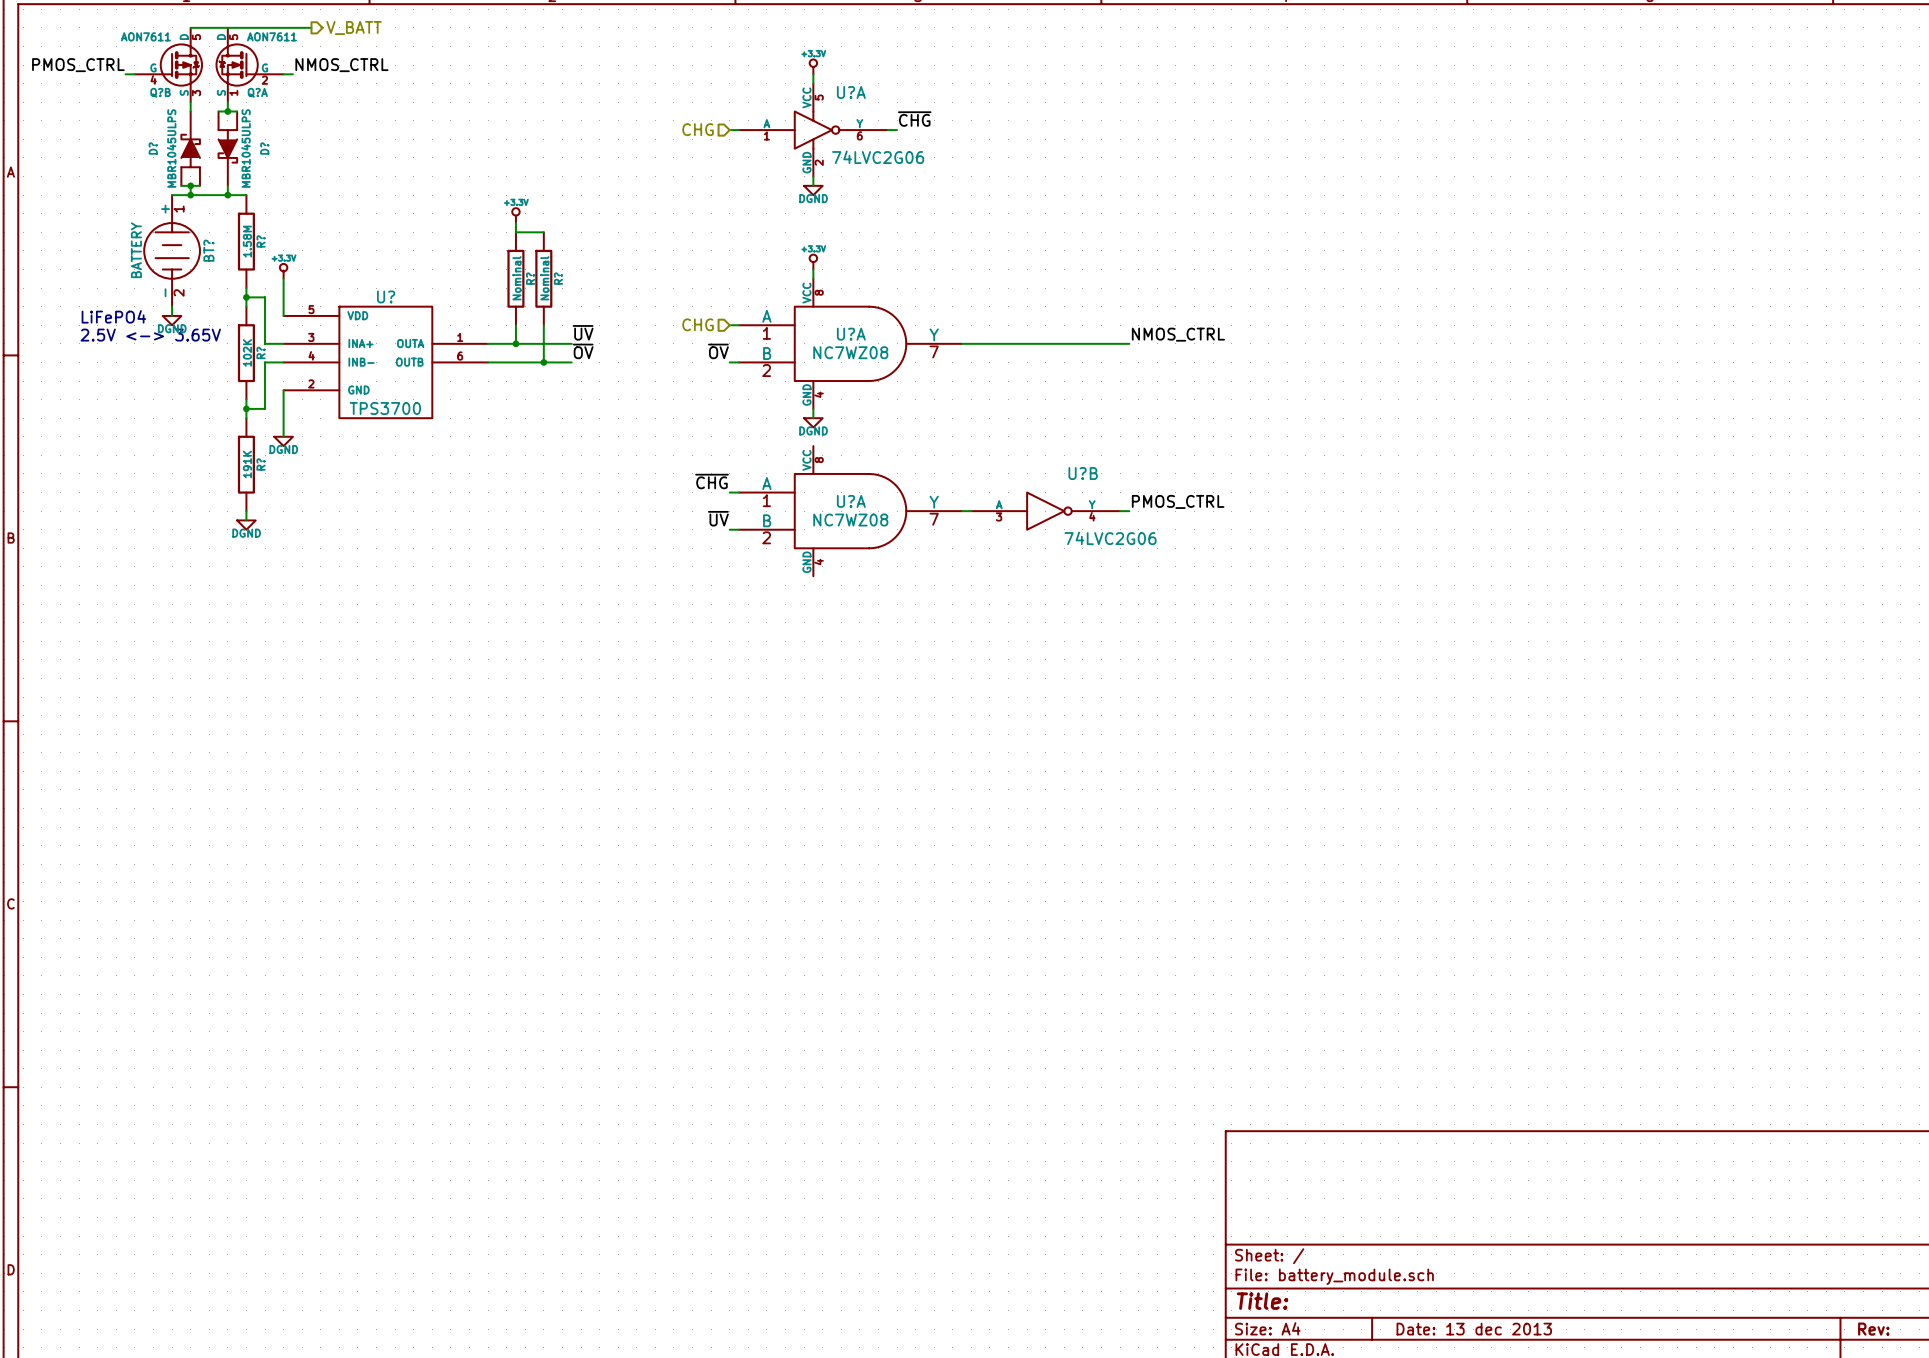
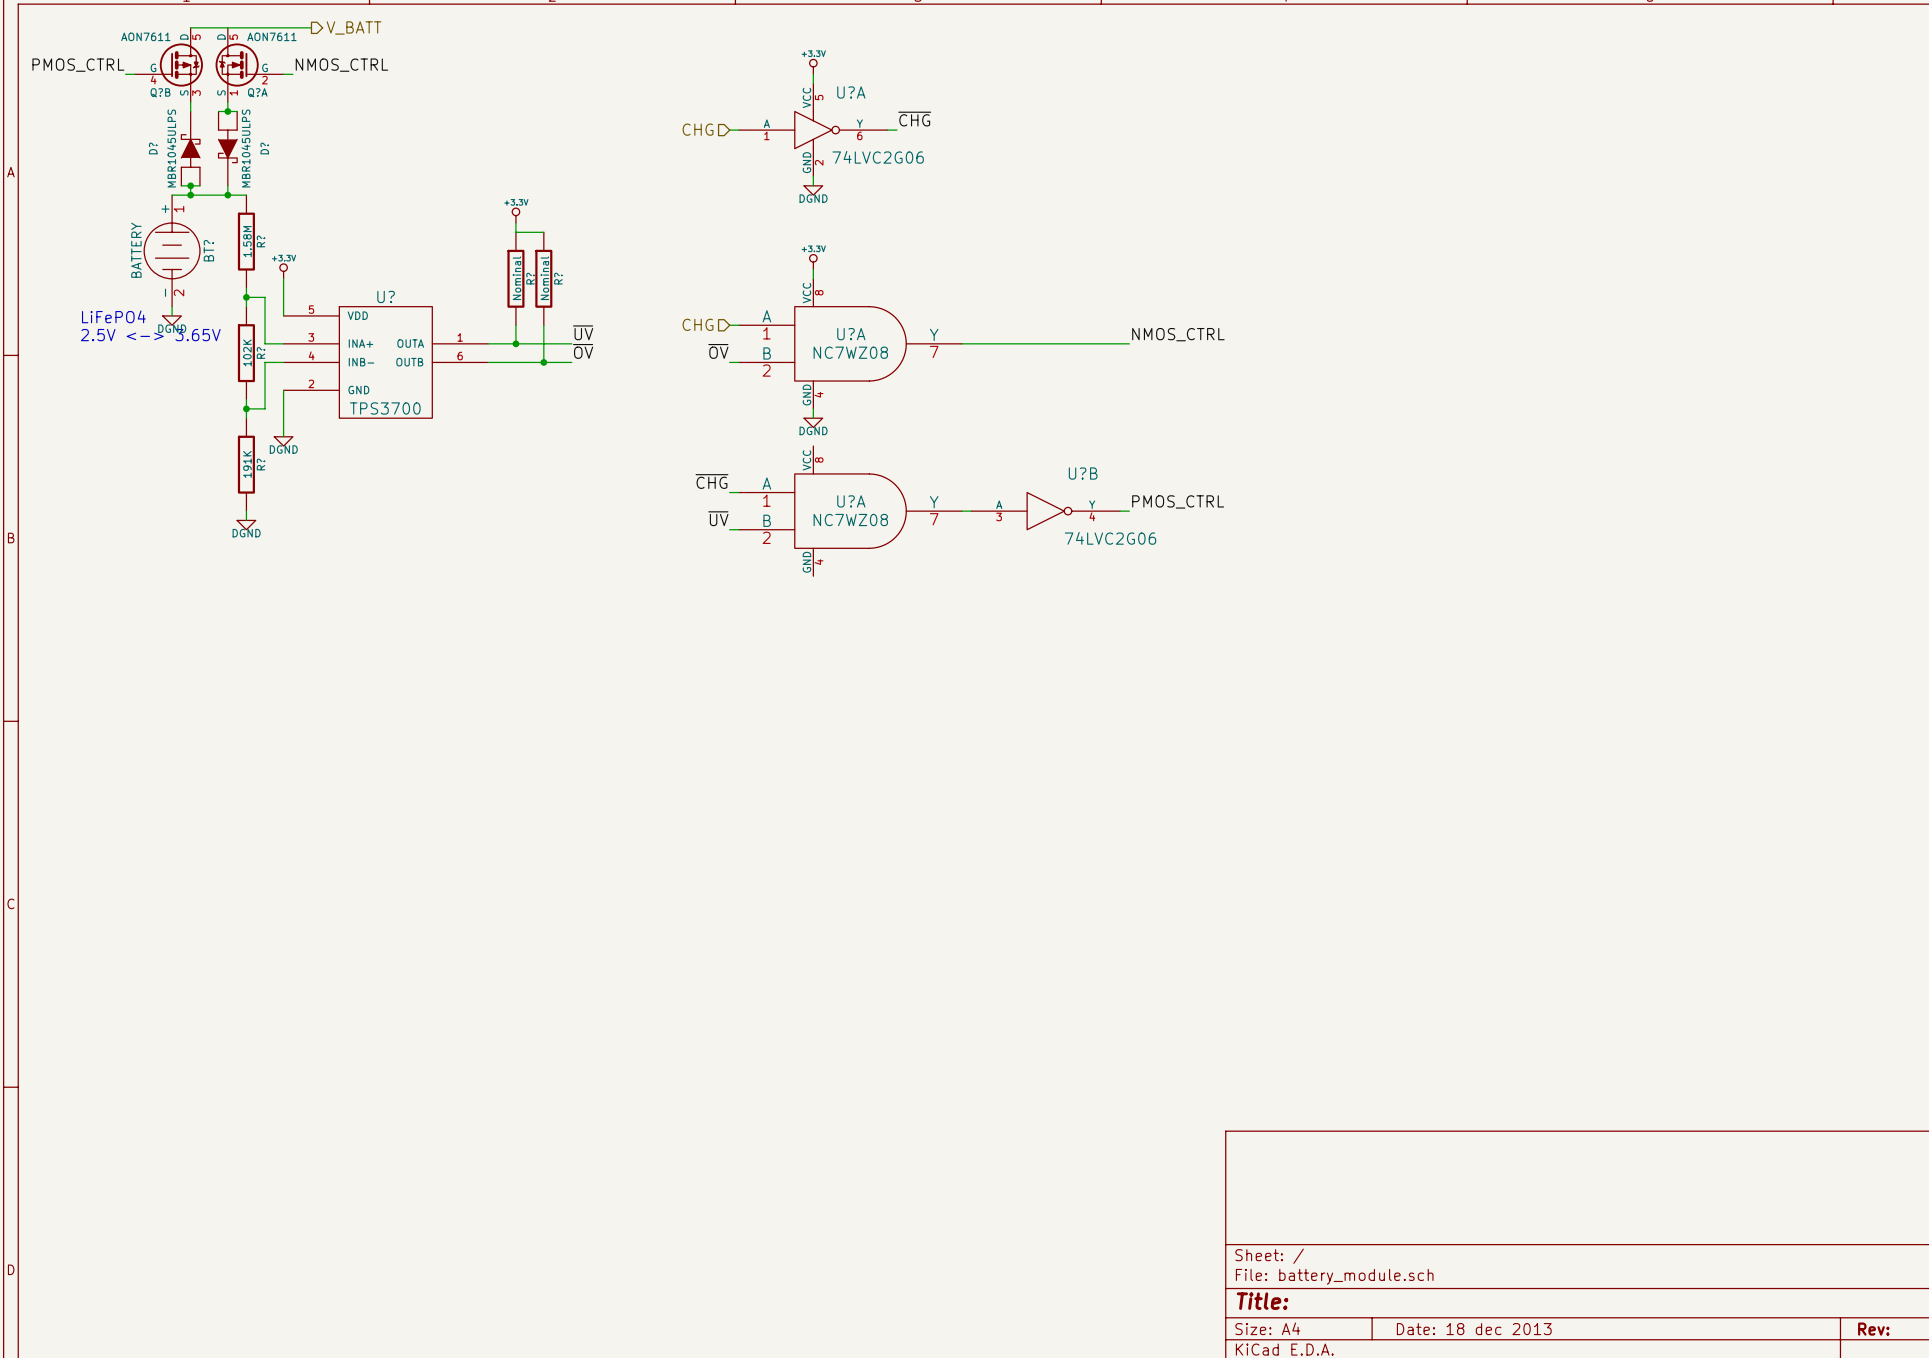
title block: Date: 13 dec 2013 (1474, 1329) -> Date: 18 dec 2013 (1474, 1329)

